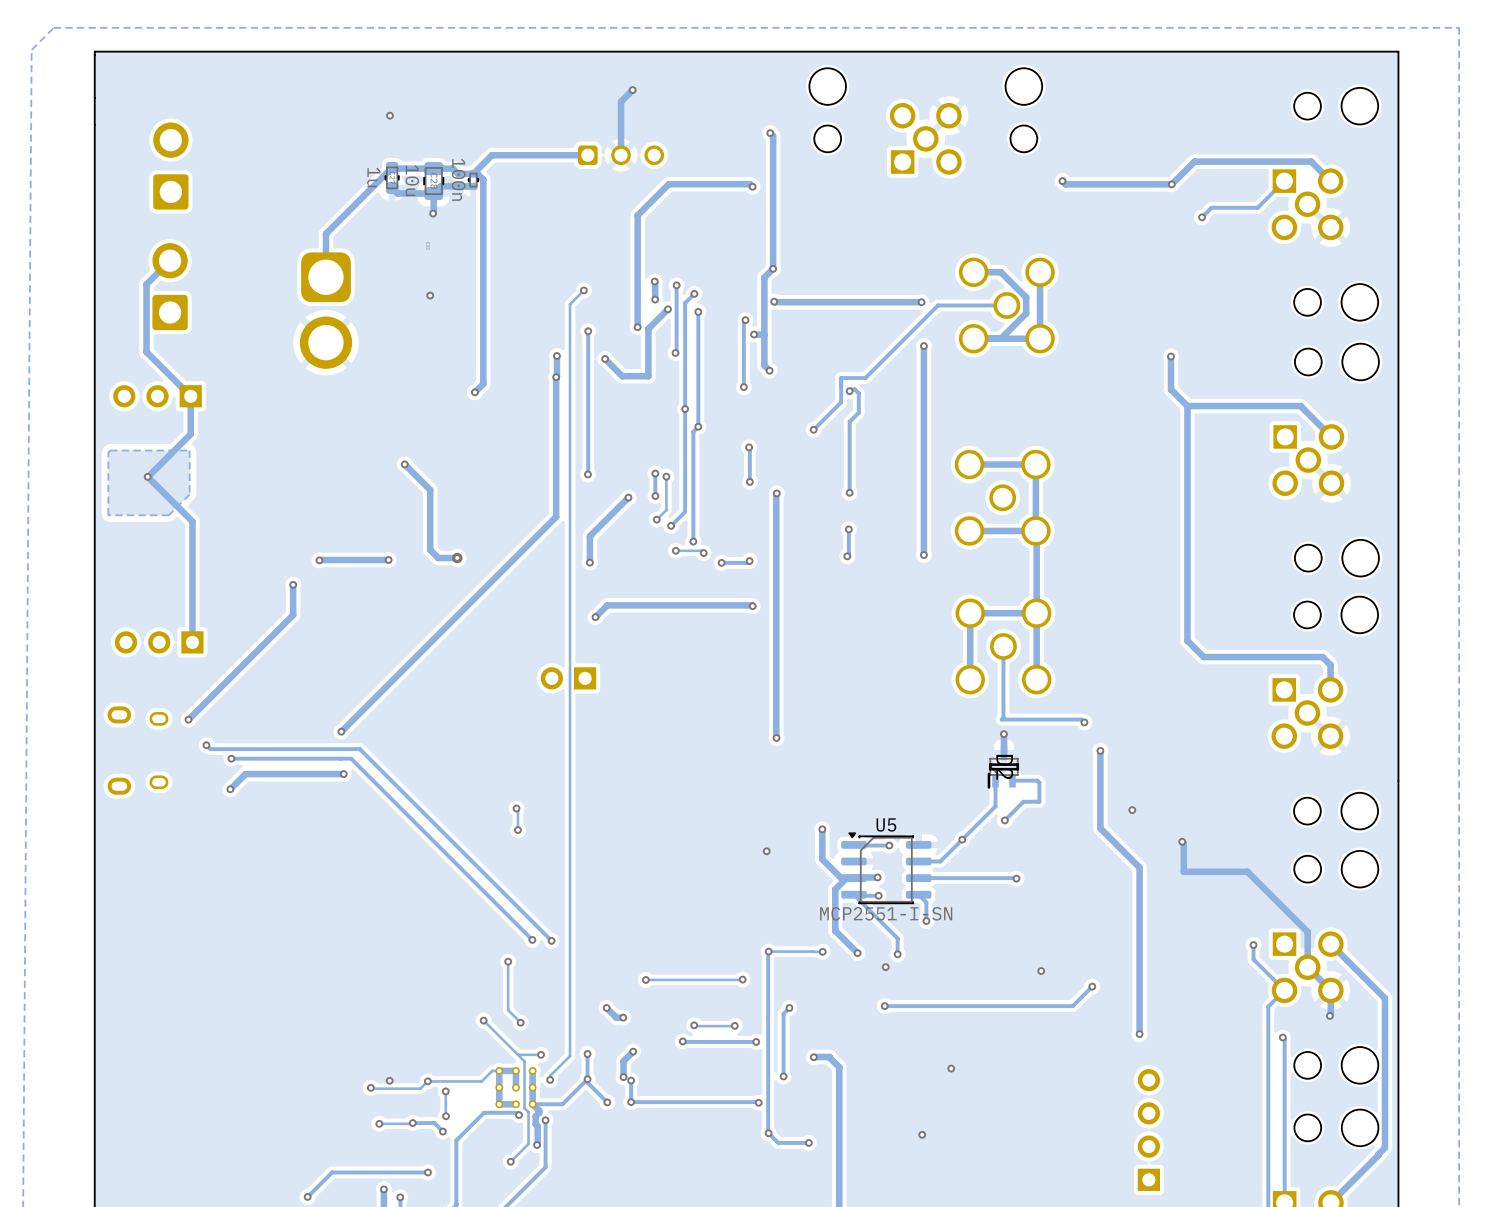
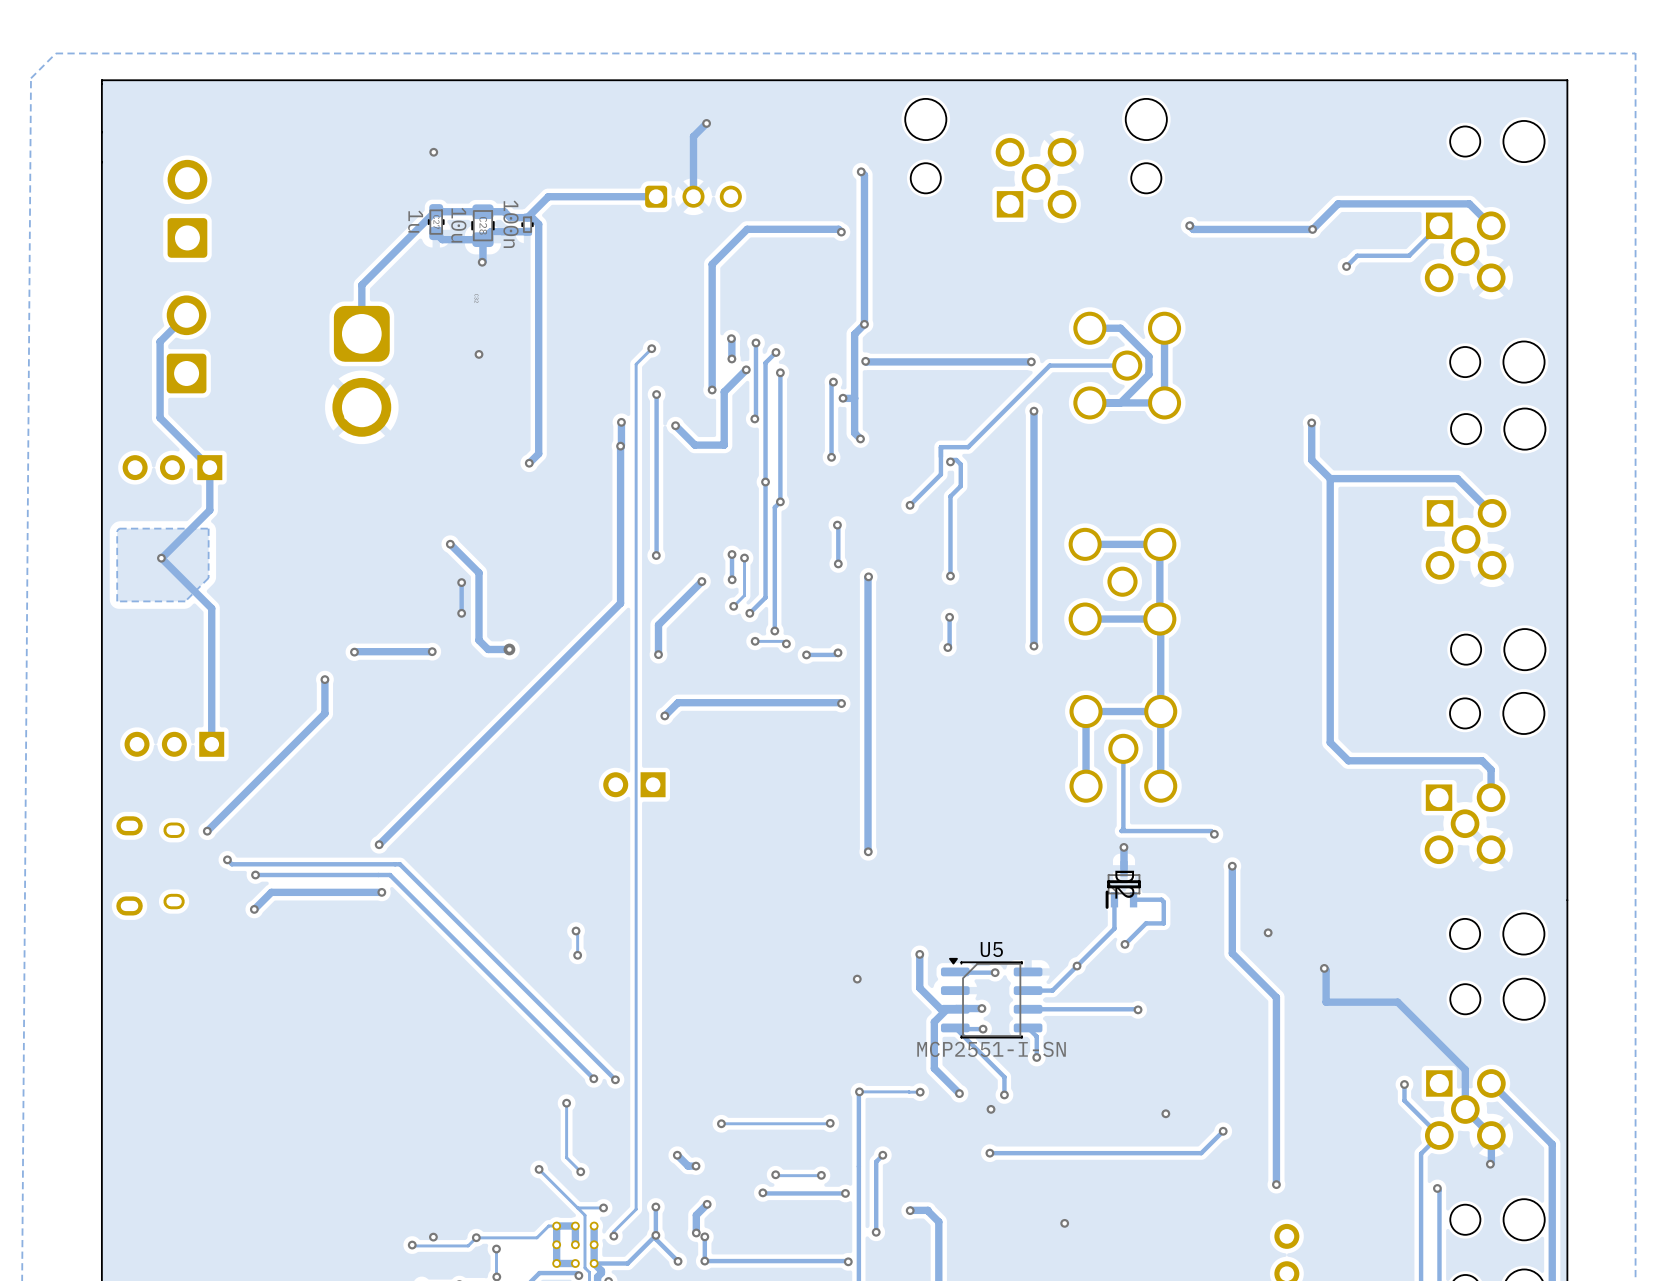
track: none -> (461, 582) (461, 613)
via: none -> (461, 582)
via: none -> (461, 613)

